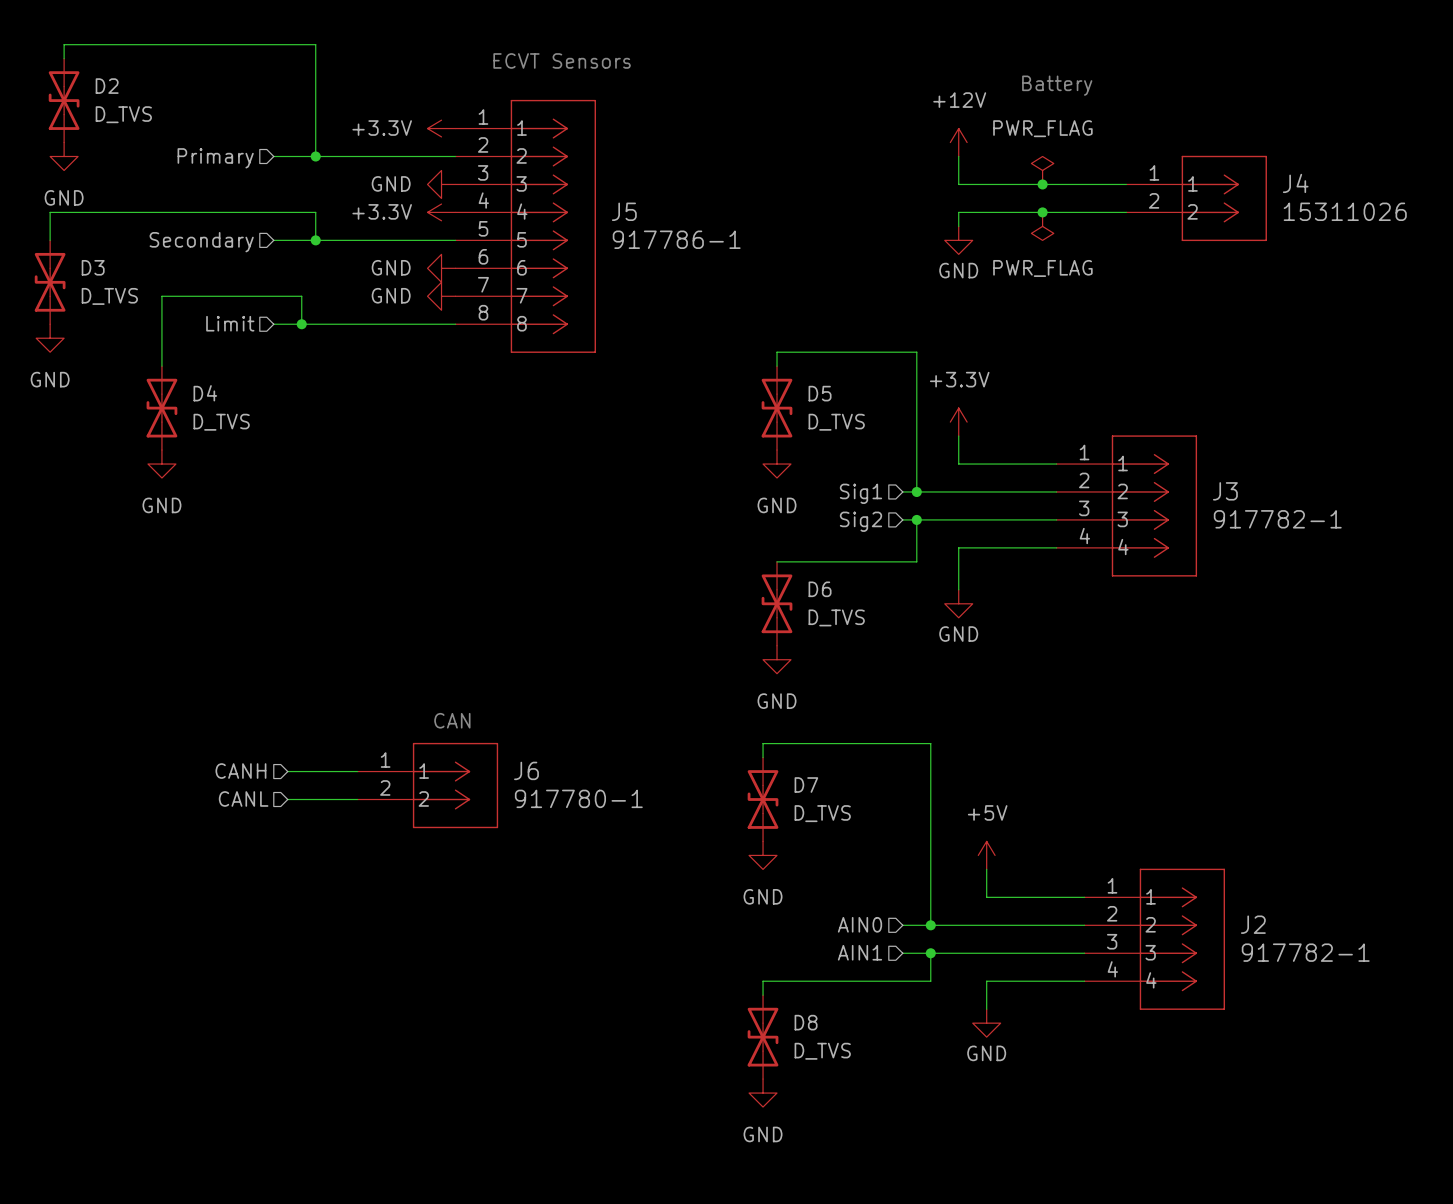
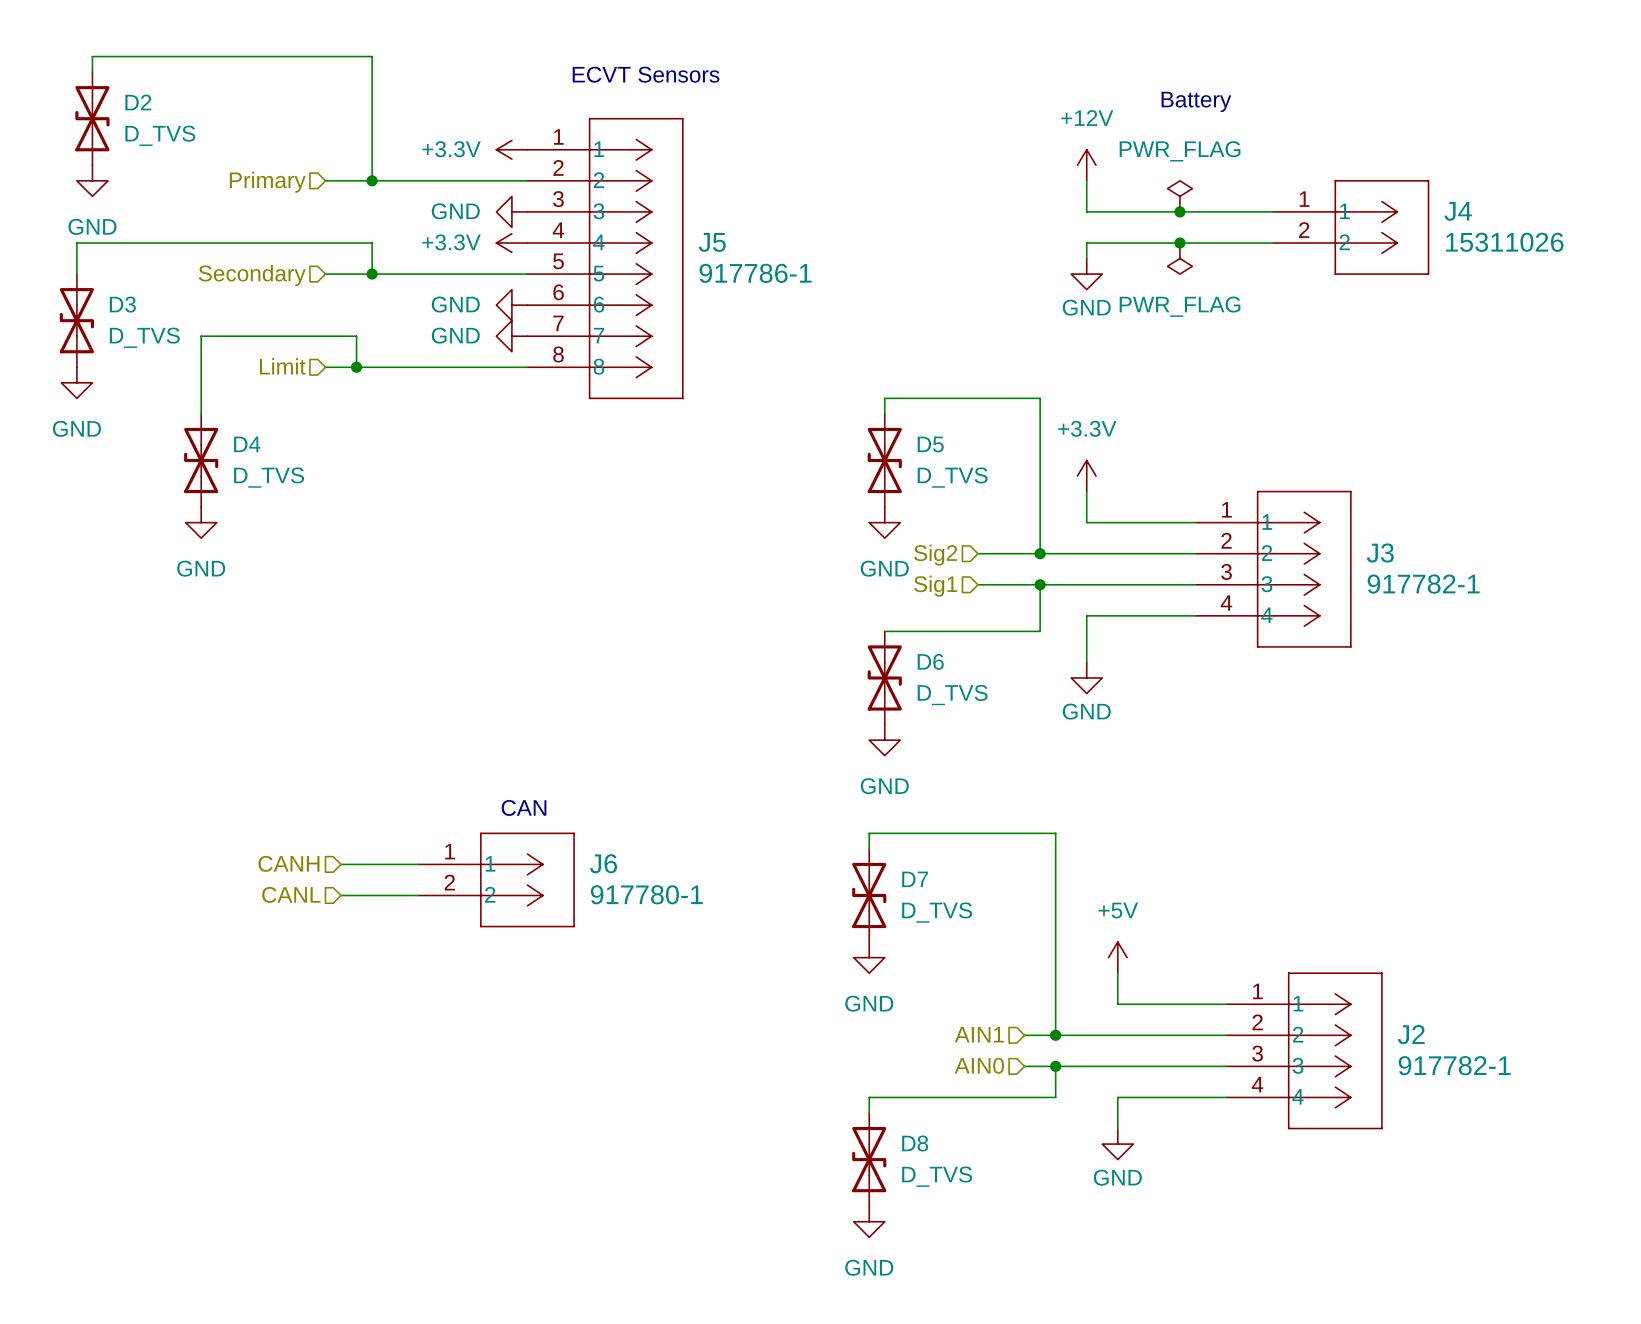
wire: none -> (977, 553) (1024, 553)
hierarchical label position: Sig1 (860, 493) -> Sig1 (935, 586)
wire: none -> (977, 584) (1024, 584)
hierarchical label position: Sig2 (860, 521) -> Sig2 (935, 555)
hierarchical label: AIN0 (859, 924) -> AIN1 (979, 1034)
hierarchical label: AIN1 (859, 952) -> AIN0 (979, 1065)

